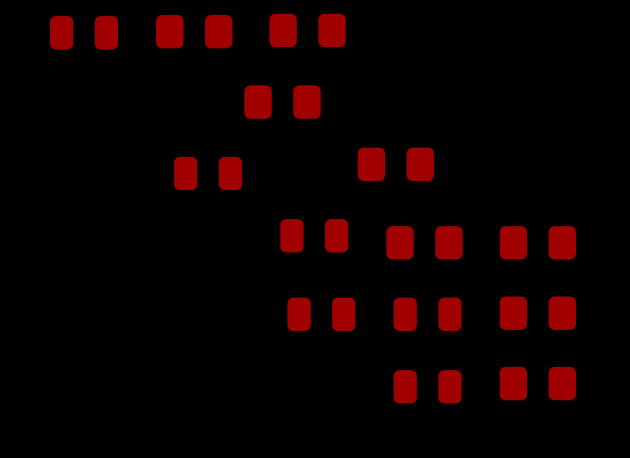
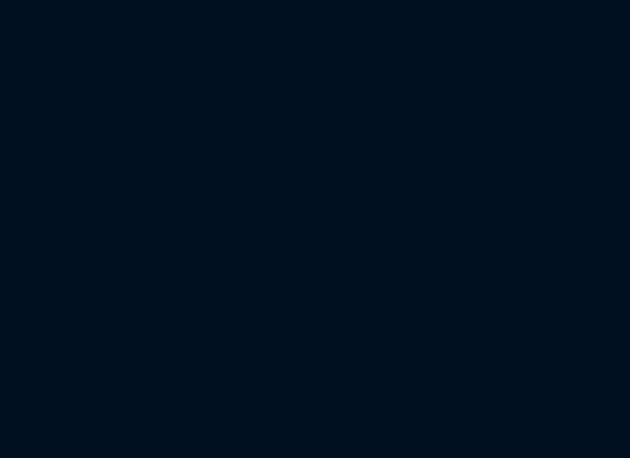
part: (307, 30) -> none
part: (194, 31) -> none
part: (84, 32) -> none
part: (282, 102) -> none
part: (395, 164) -> none
part: (208, 173) -> none
part: (314, 235) -> none
part: (424, 242) -> none
part: (537, 242) -> none
part: (537, 313) -> none
part: (321, 314) -> none
part: (427, 314) -> none
part: (537, 383) -> none
part: (427, 386) -> none

